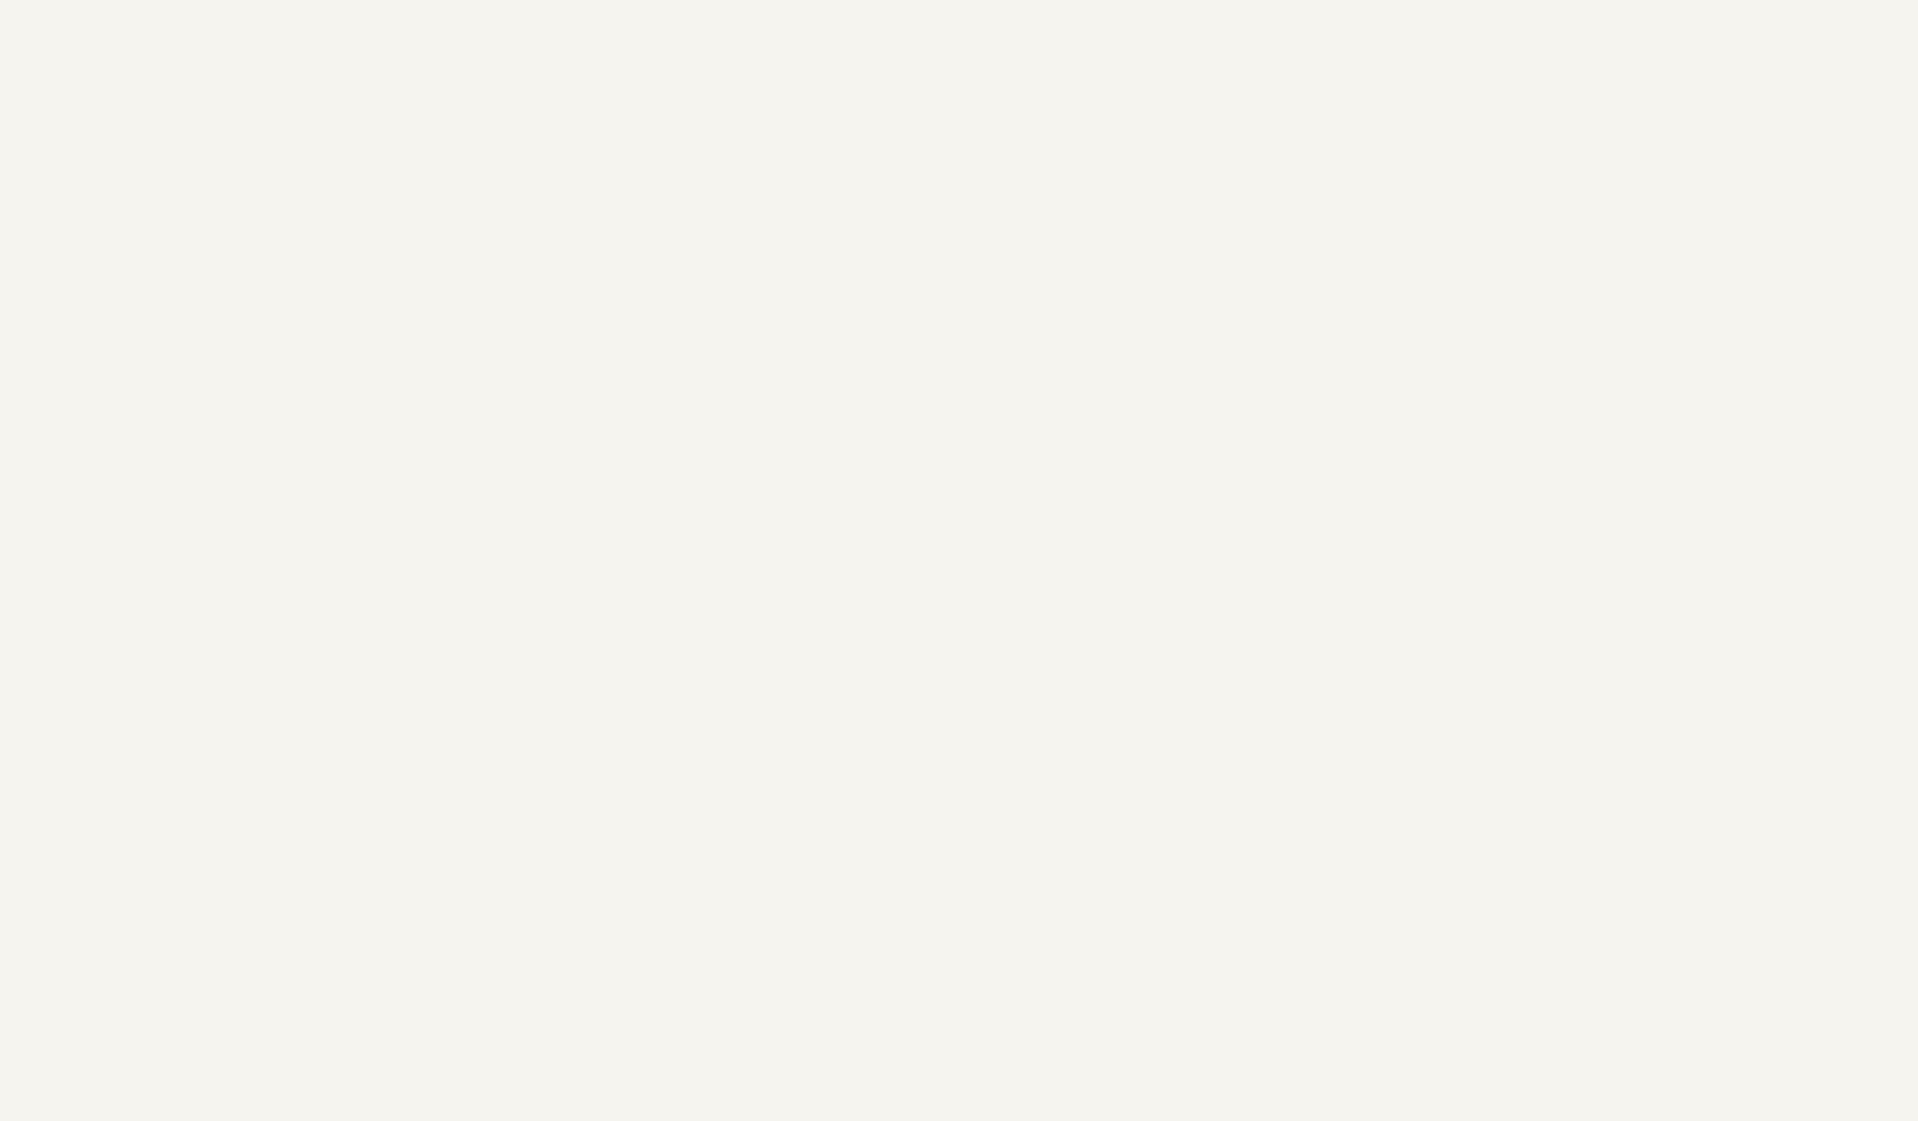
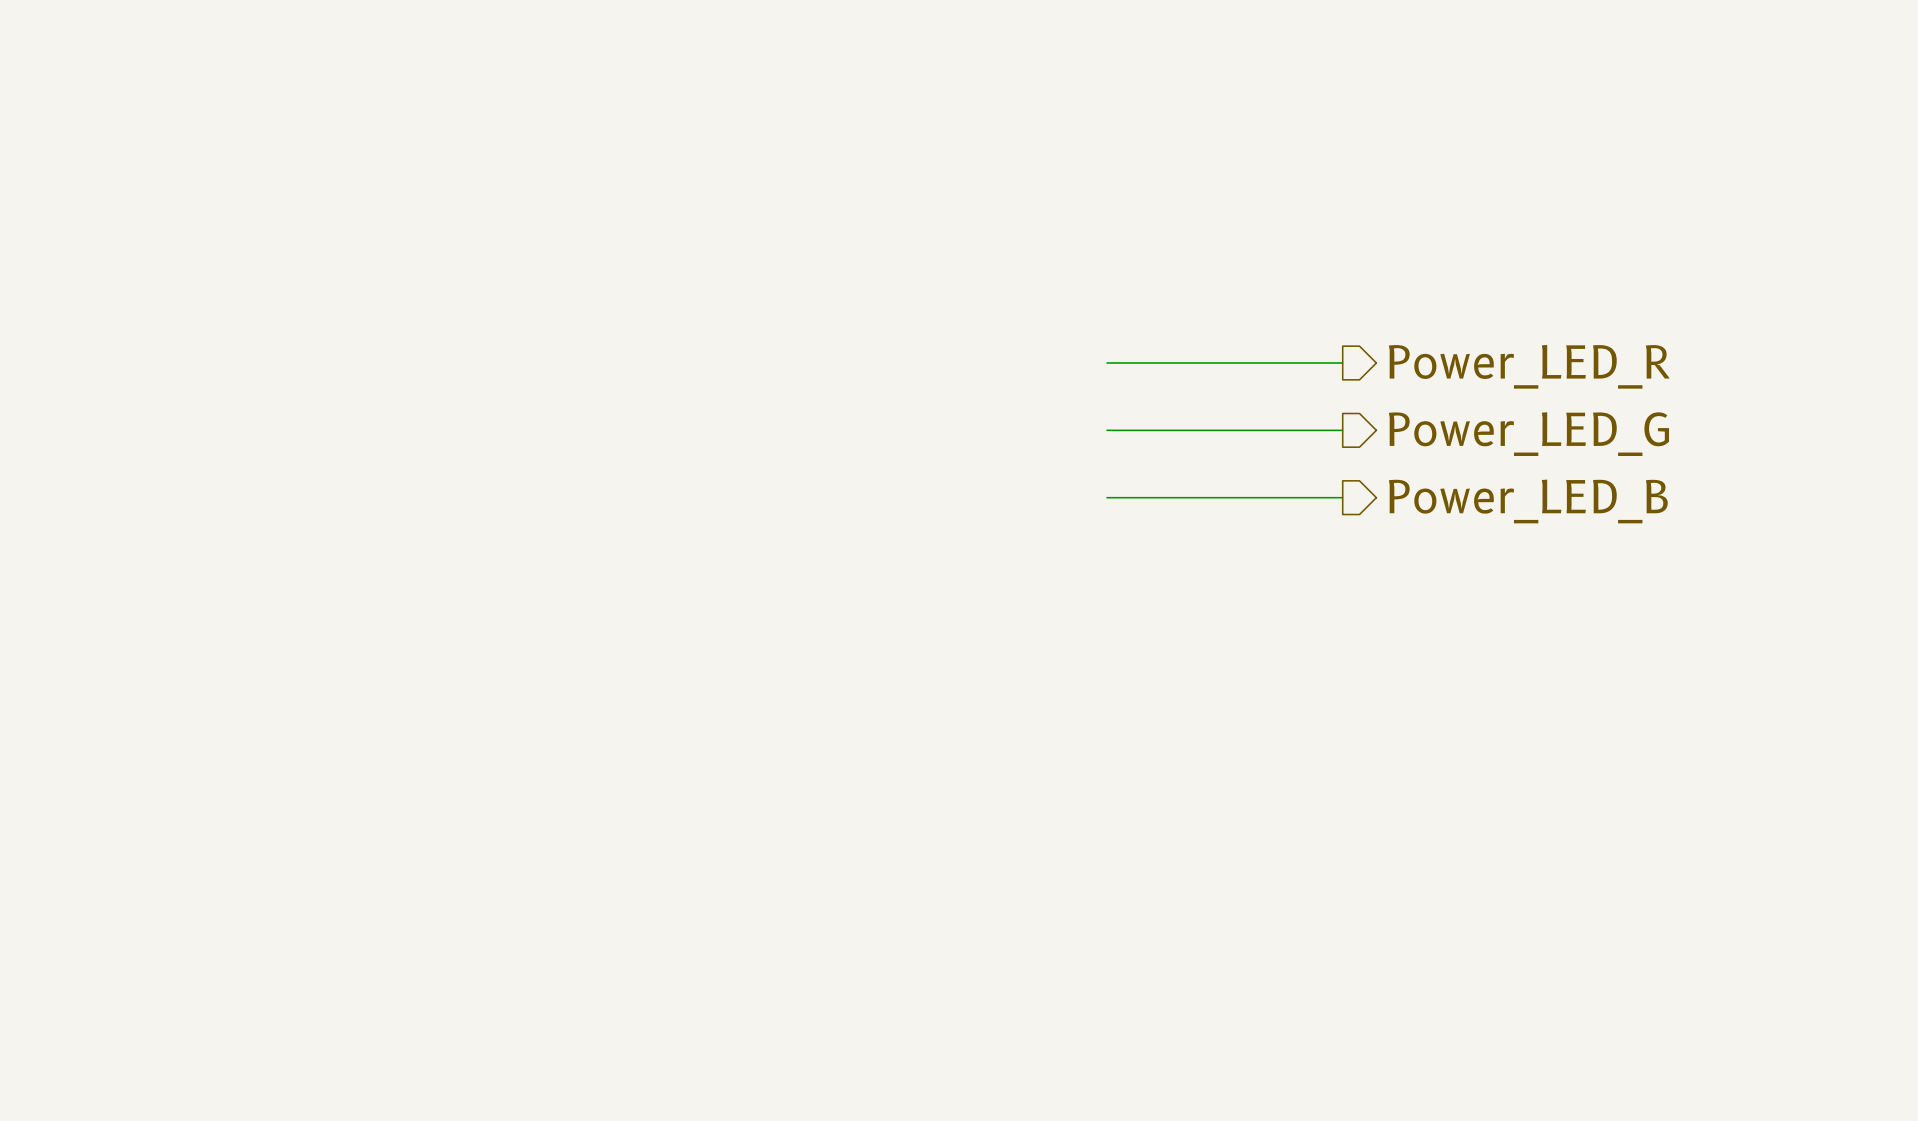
wire: none -> (1107, 363) (1342, 363)
hierarchical label: none -> Power_LED_R (1529, 366)
wire: none -> (1107, 430) (1342, 430)
hierarchical label: none -> Power_LED_G (1528, 434)
wire: none -> (1107, 497) (1342, 497)
hierarchical label: none -> Power_LED_B (1528, 501)

